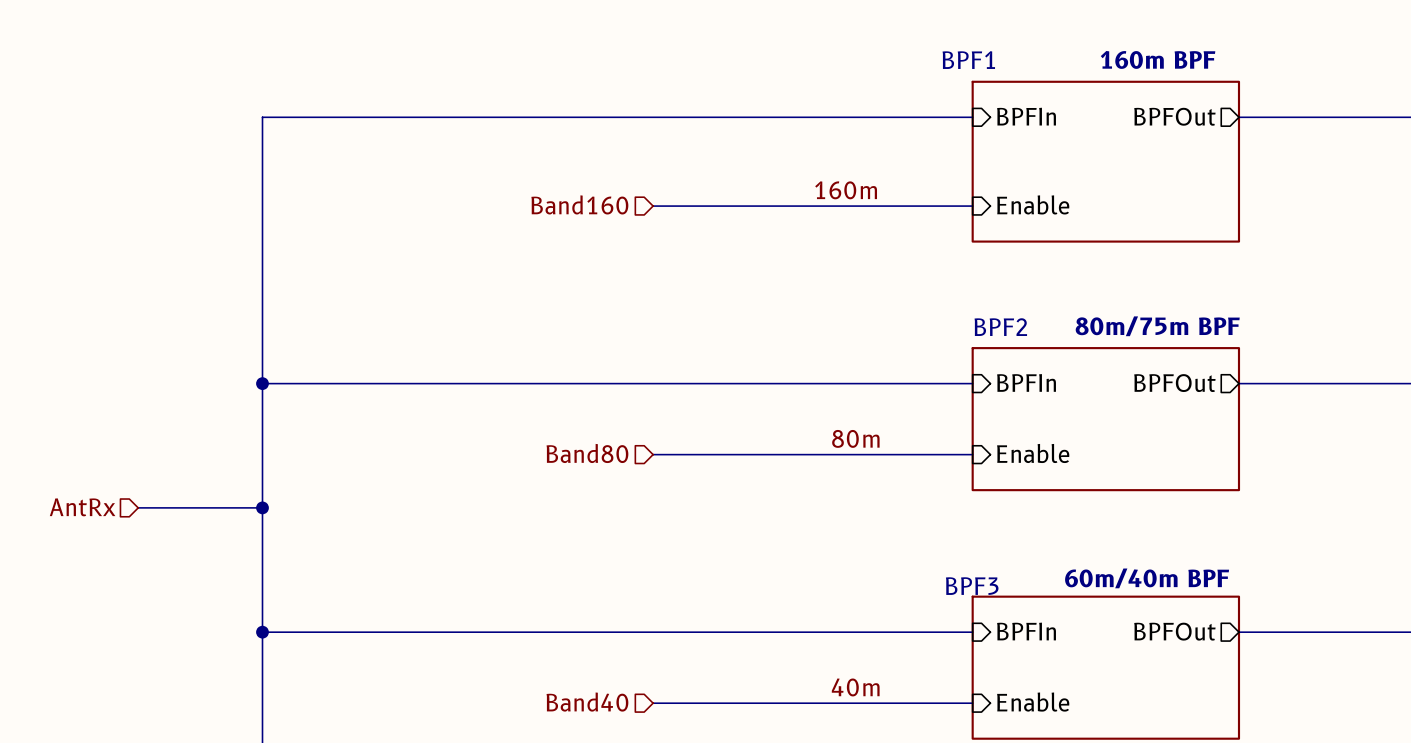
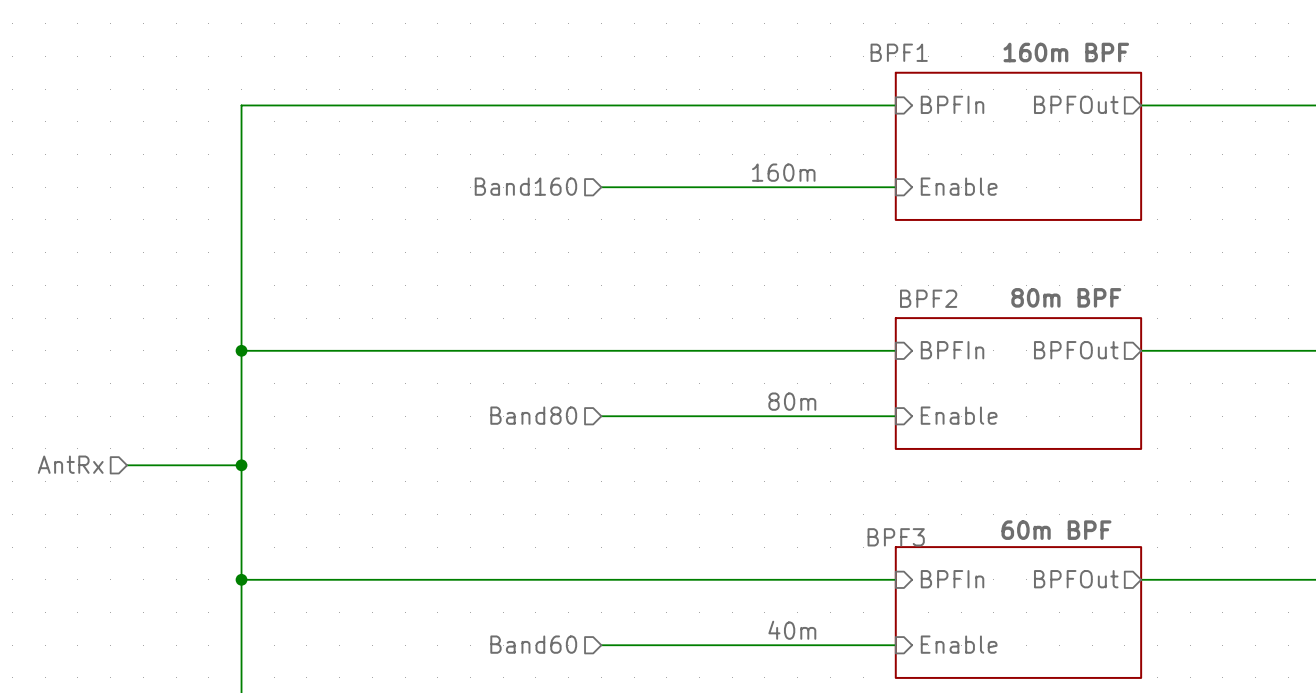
sheet BPF2 text: 80m/75m BPF (1157, 326) -> 80m BPF (1066, 297)
sheet BPF3 text: 60m/40m BPF (1147, 578) -> 60m BPF (1056, 530)
hierarchical label: Band40 (587, 702) -> Band60 (533, 644)

